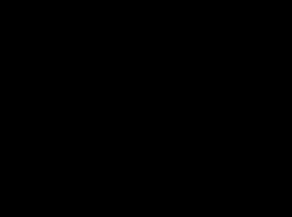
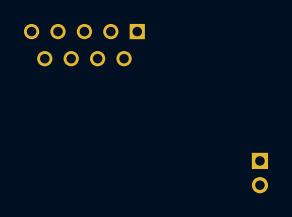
part: none -> (84, 45)
part: none -> (259, 173)

